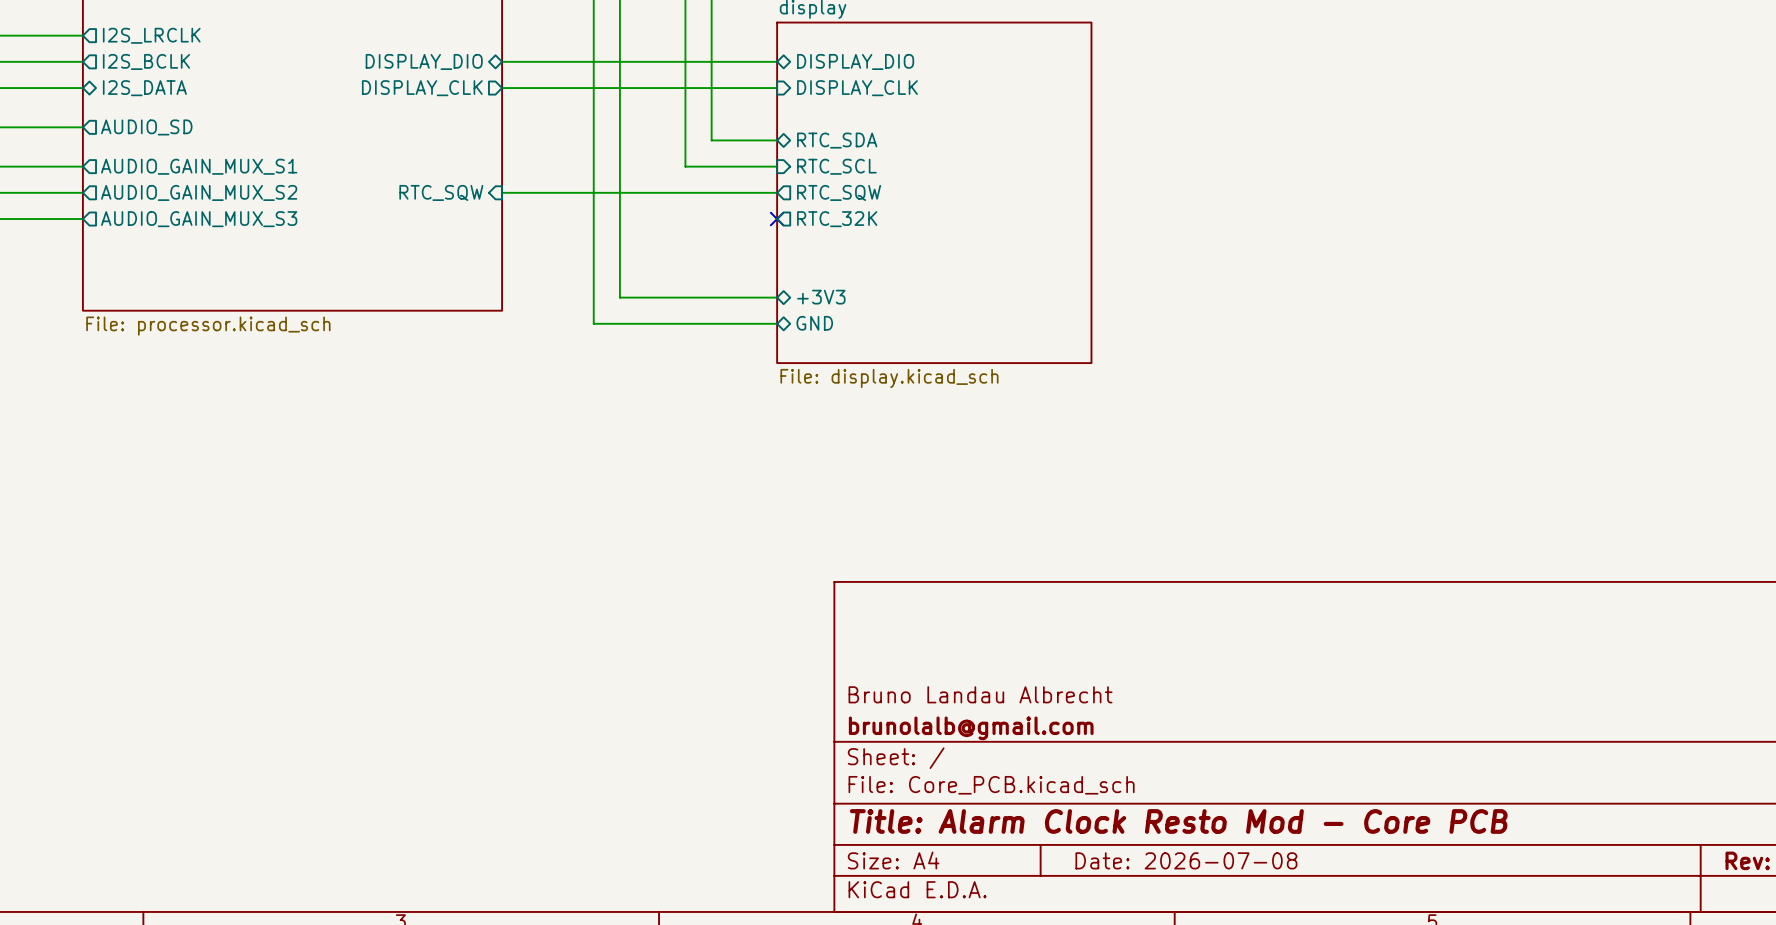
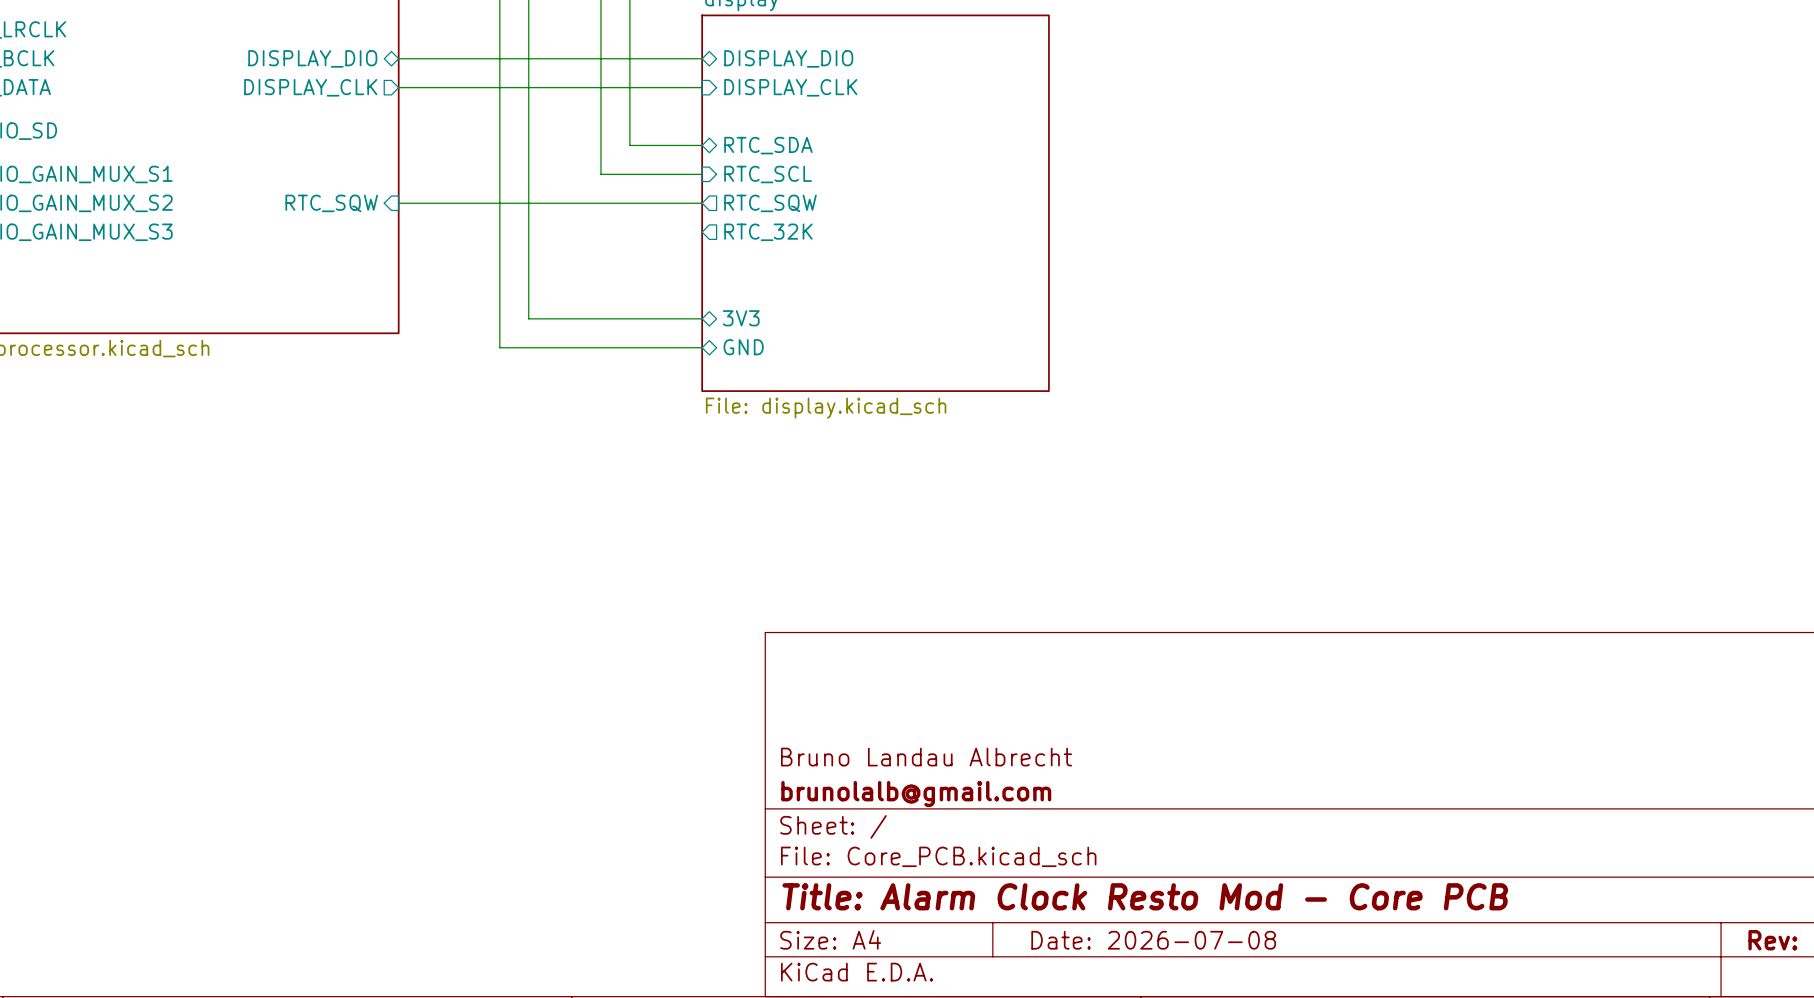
no-connect mark: (777, 219) -> none
sheet pin: +3V3 (821, 297) -> 3V3 (741, 318)

